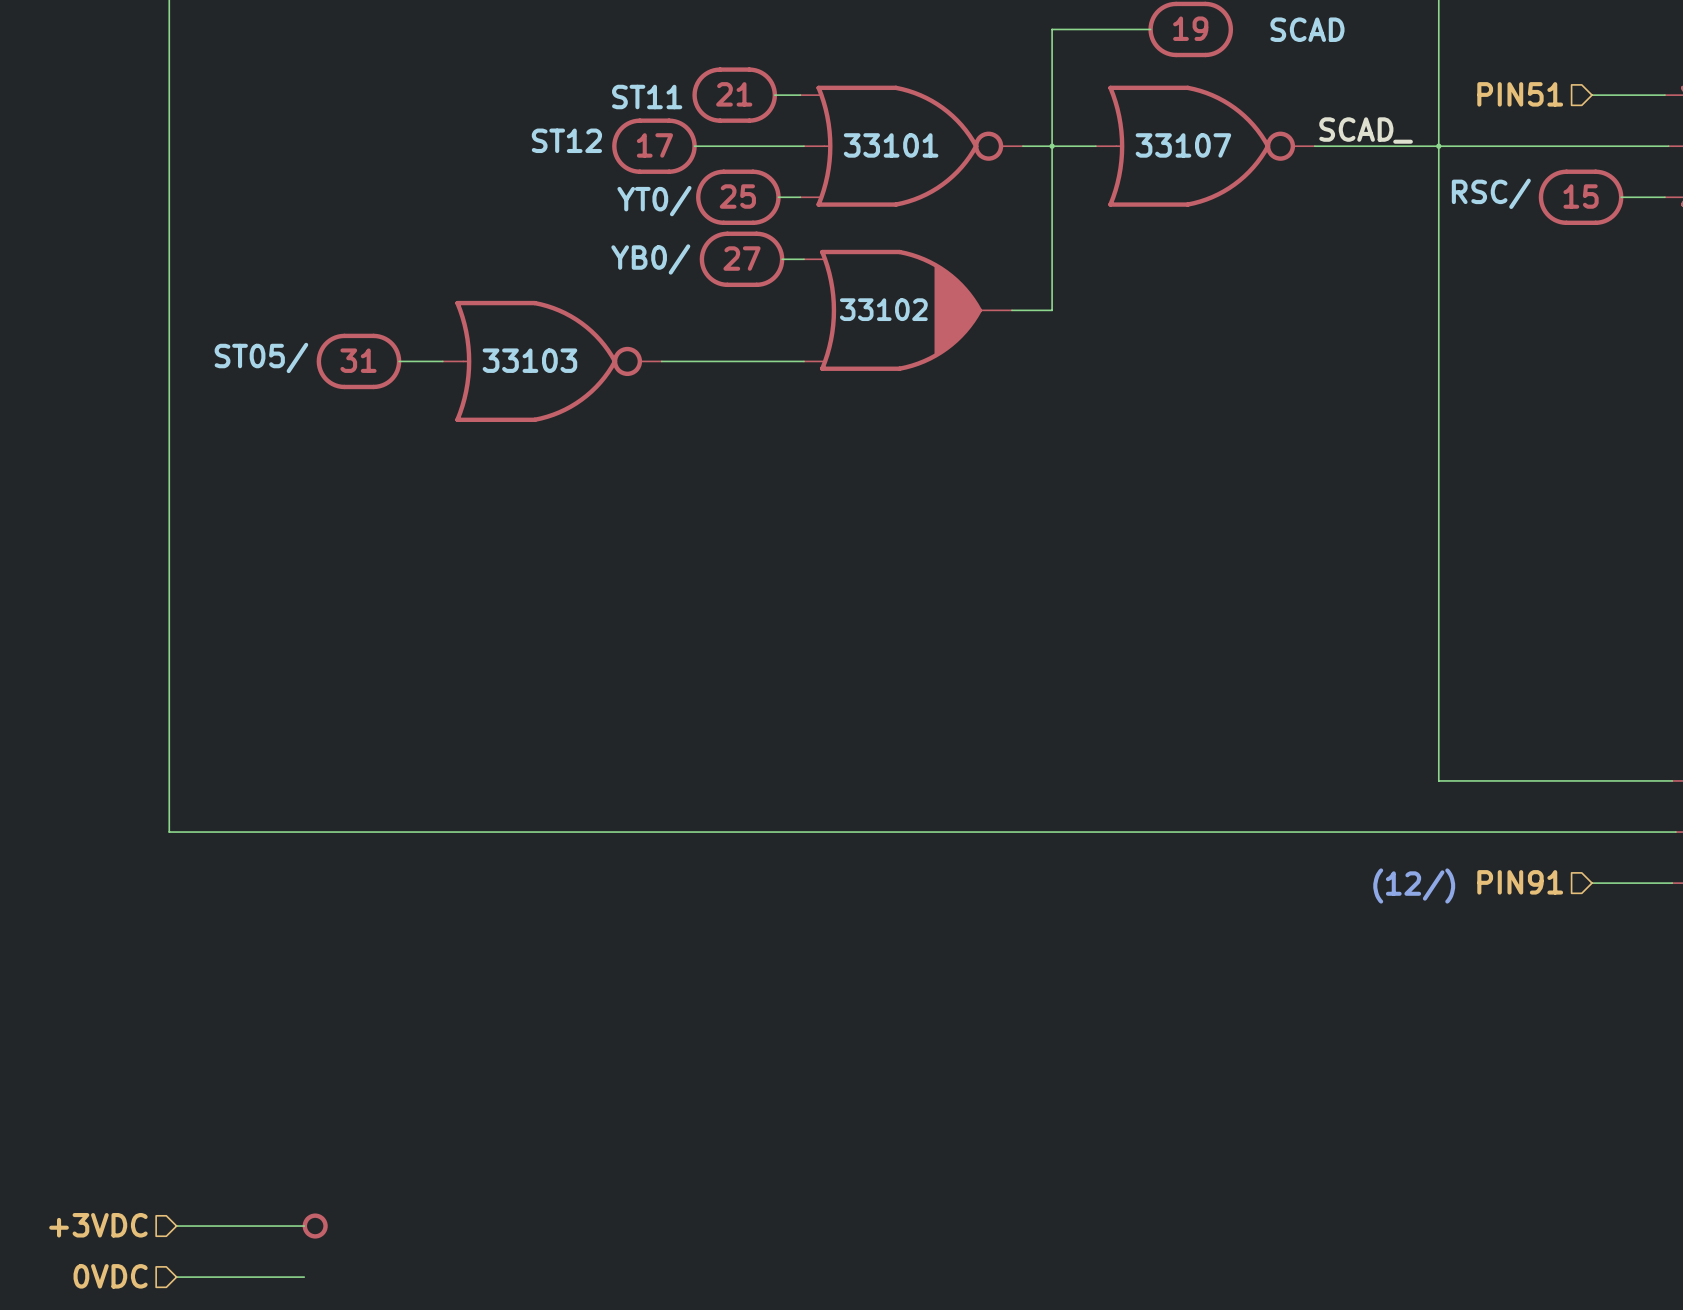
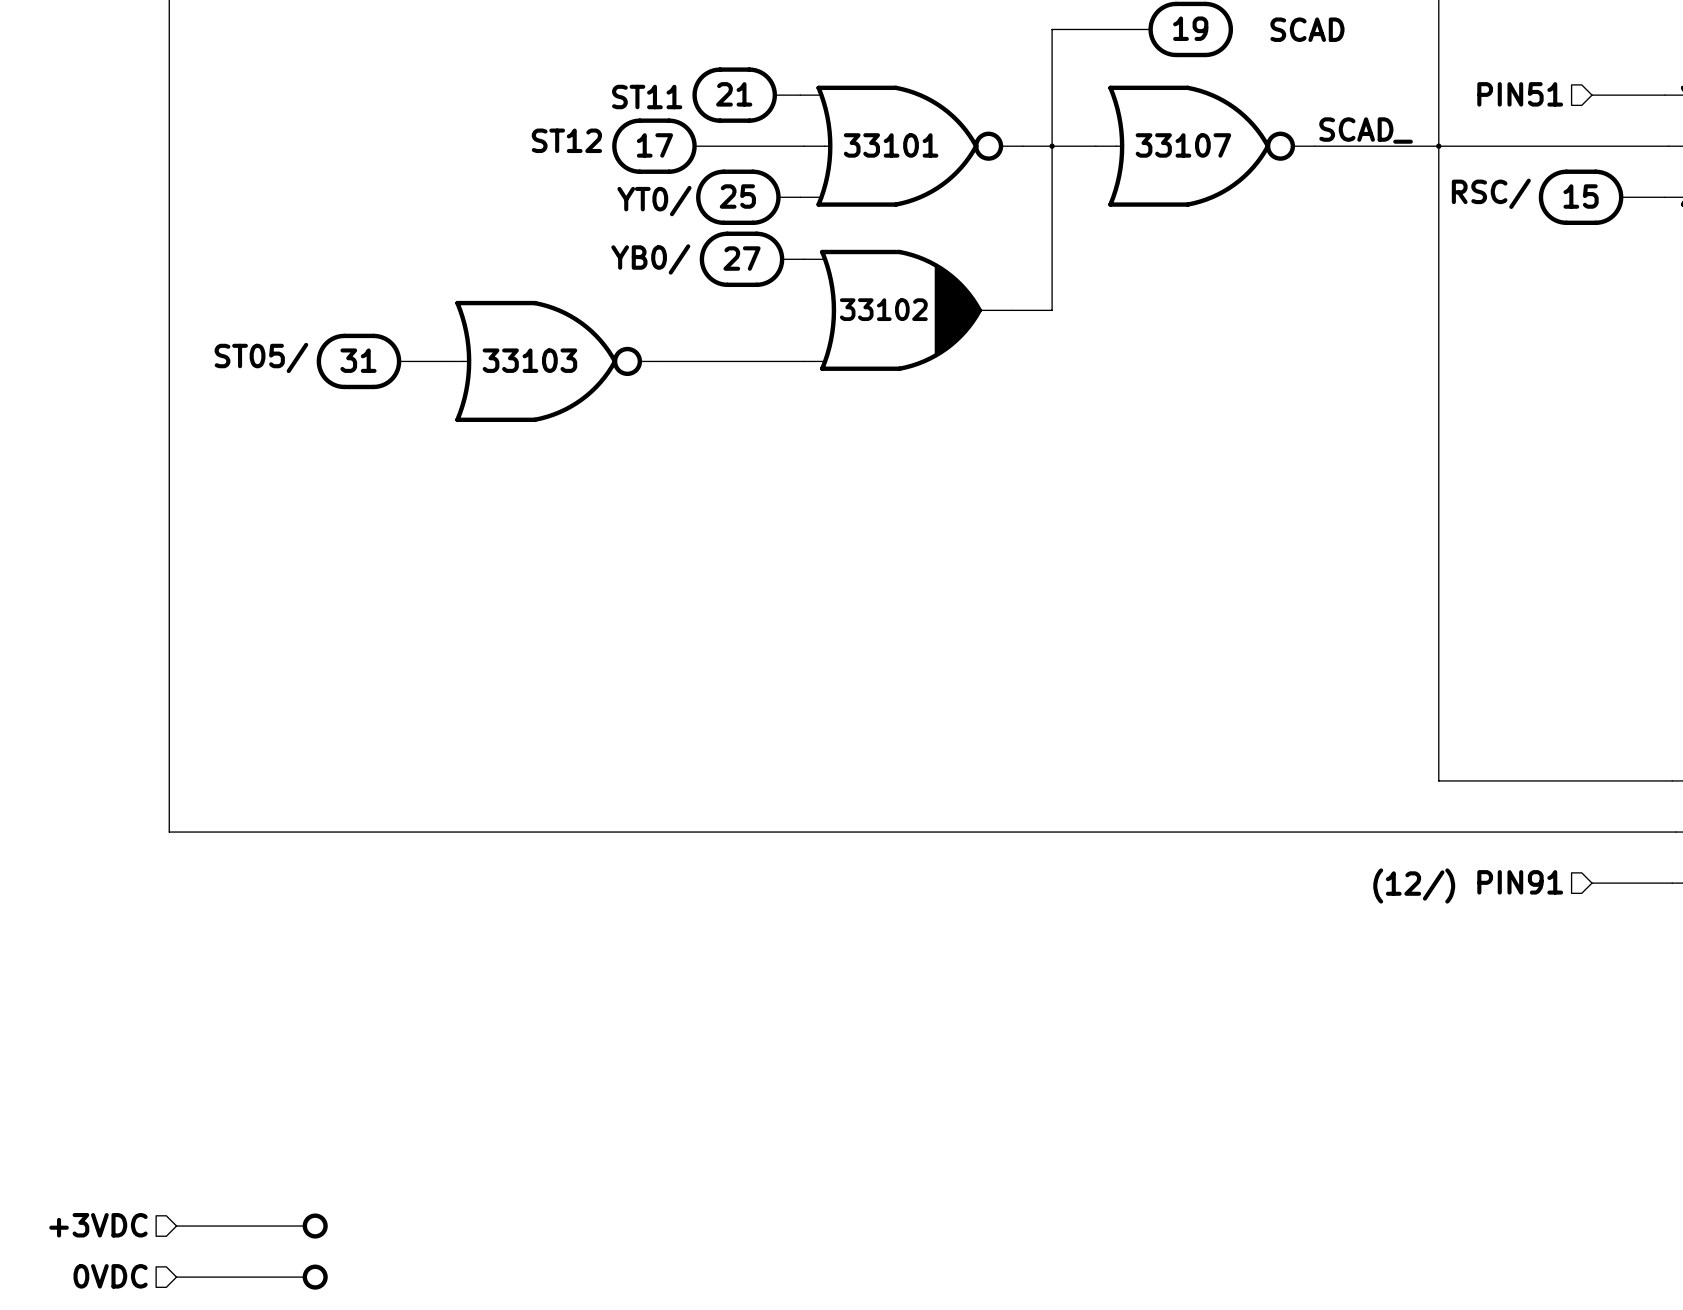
part: none -> (315, 1277)

